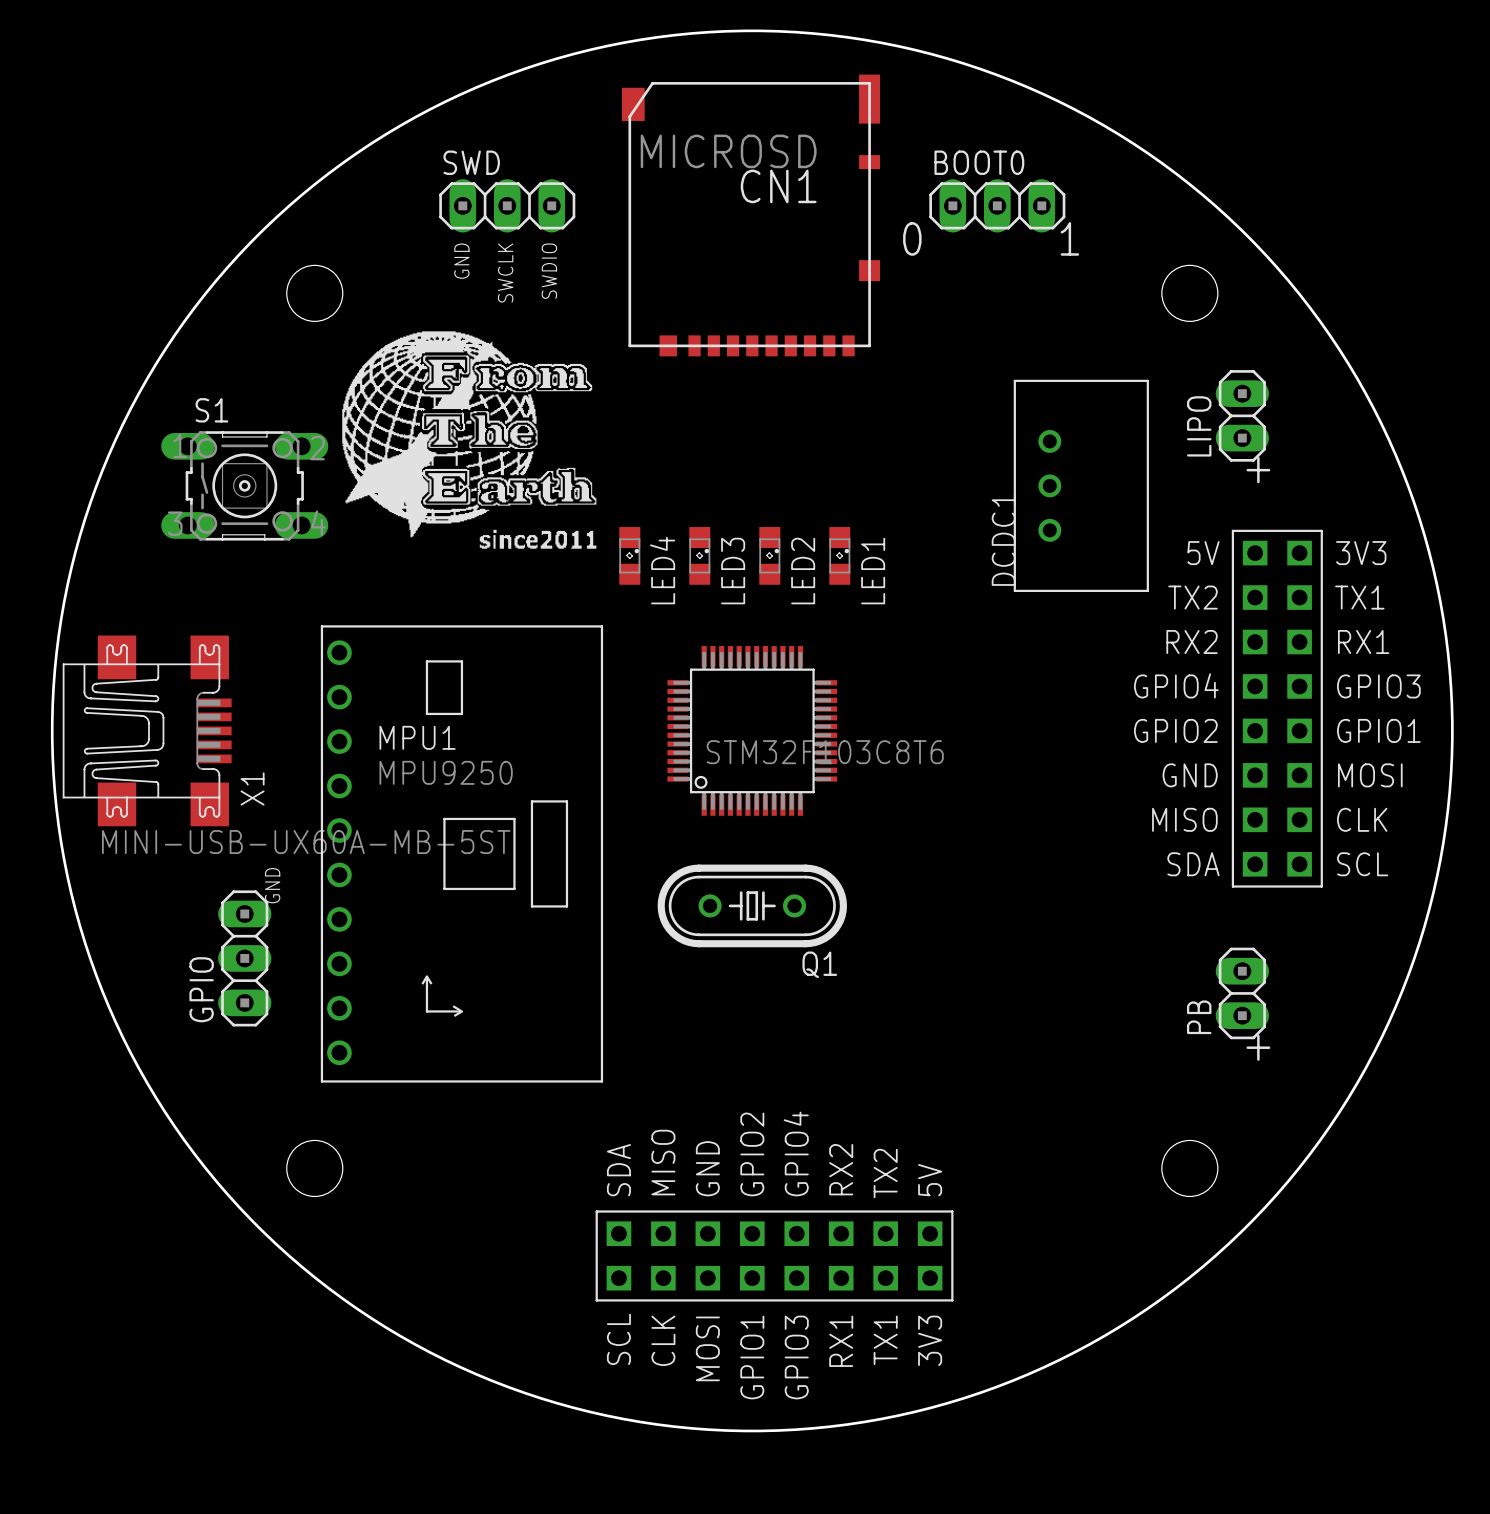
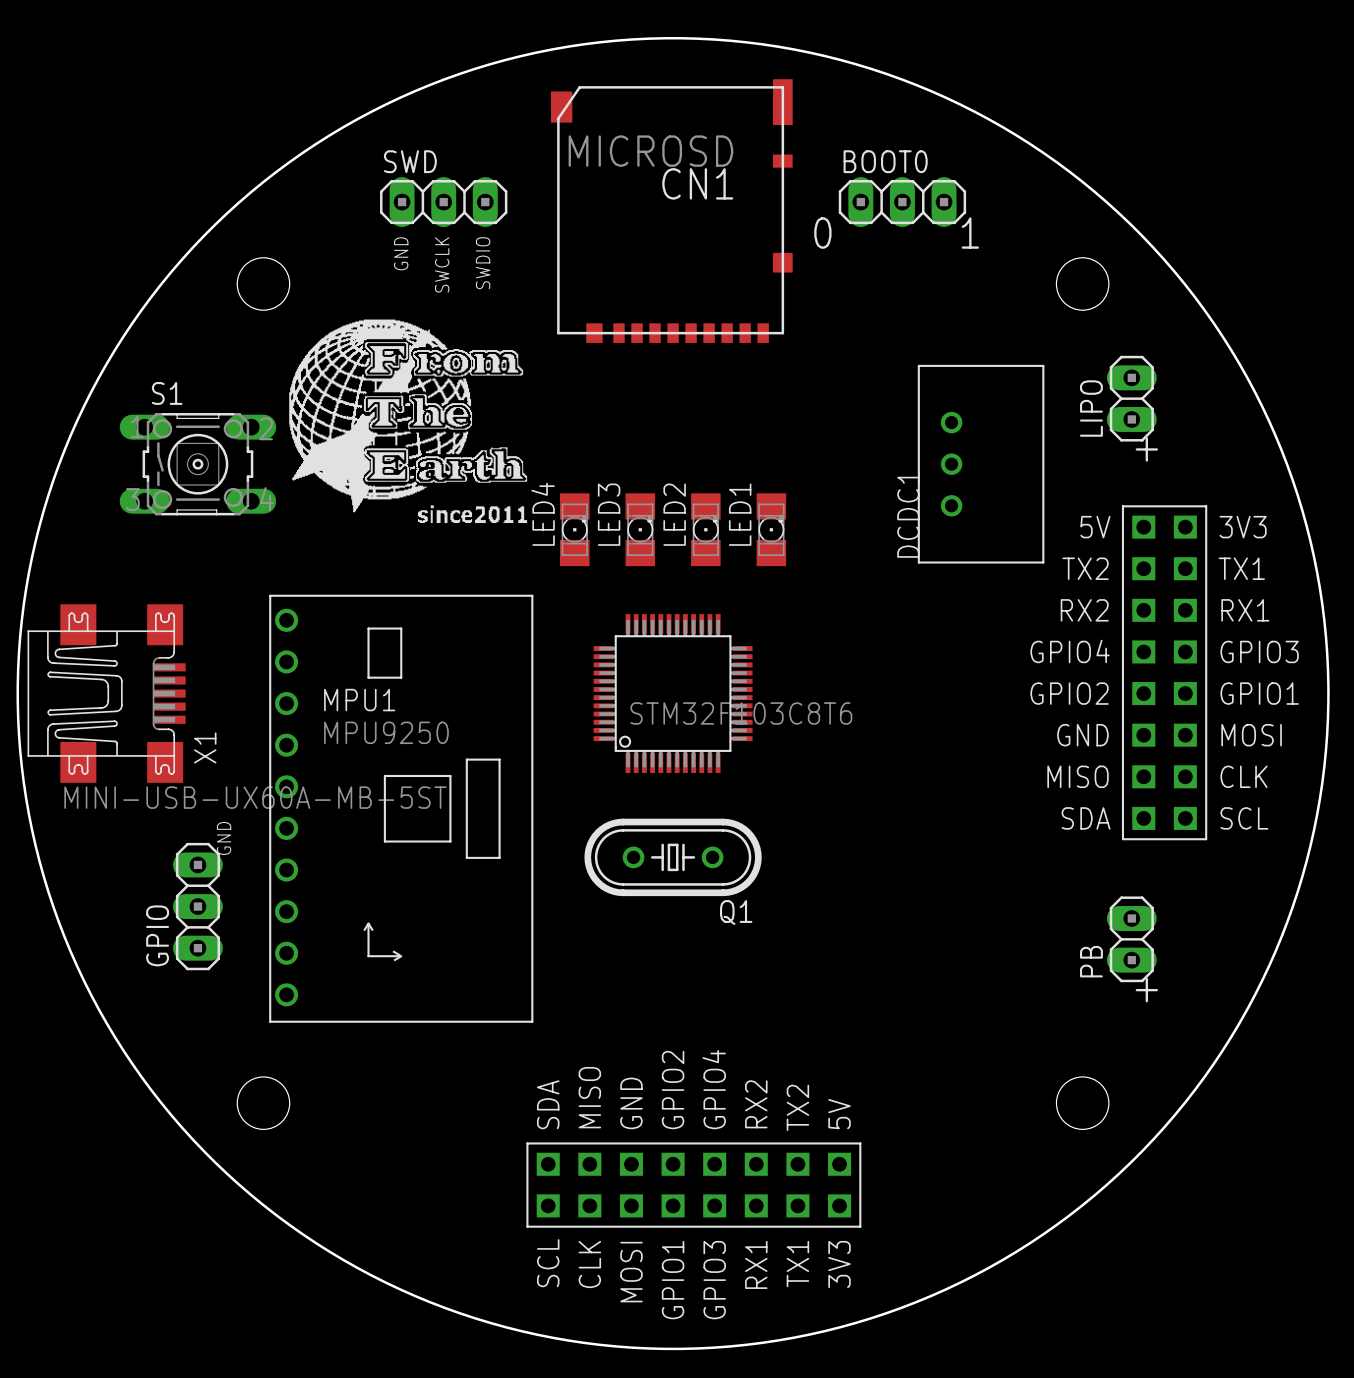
LED4 footprint: [619, 527, 641, 585] -> [560, 493, 590, 567]
LED3 footprint: [689, 527, 711, 585] -> [625, 493, 656, 567]
LED2 footprint: [759, 527, 781, 585] -> [691, 493, 721, 567]
LED1 footprint: [829, 527, 851, 585] -> [756, 493, 787, 567]
LED4 name position: LED4 (662, 570) -> LED4 (543, 514)
LED3 name position: LED3 (733, 571) -> LED3 (609, 514)
LED2 name position: LED2 (803, 571) -> LED2 (674, 514)
LED1 name position: LED1 (873, 571) -> LED1 (740, 514)

